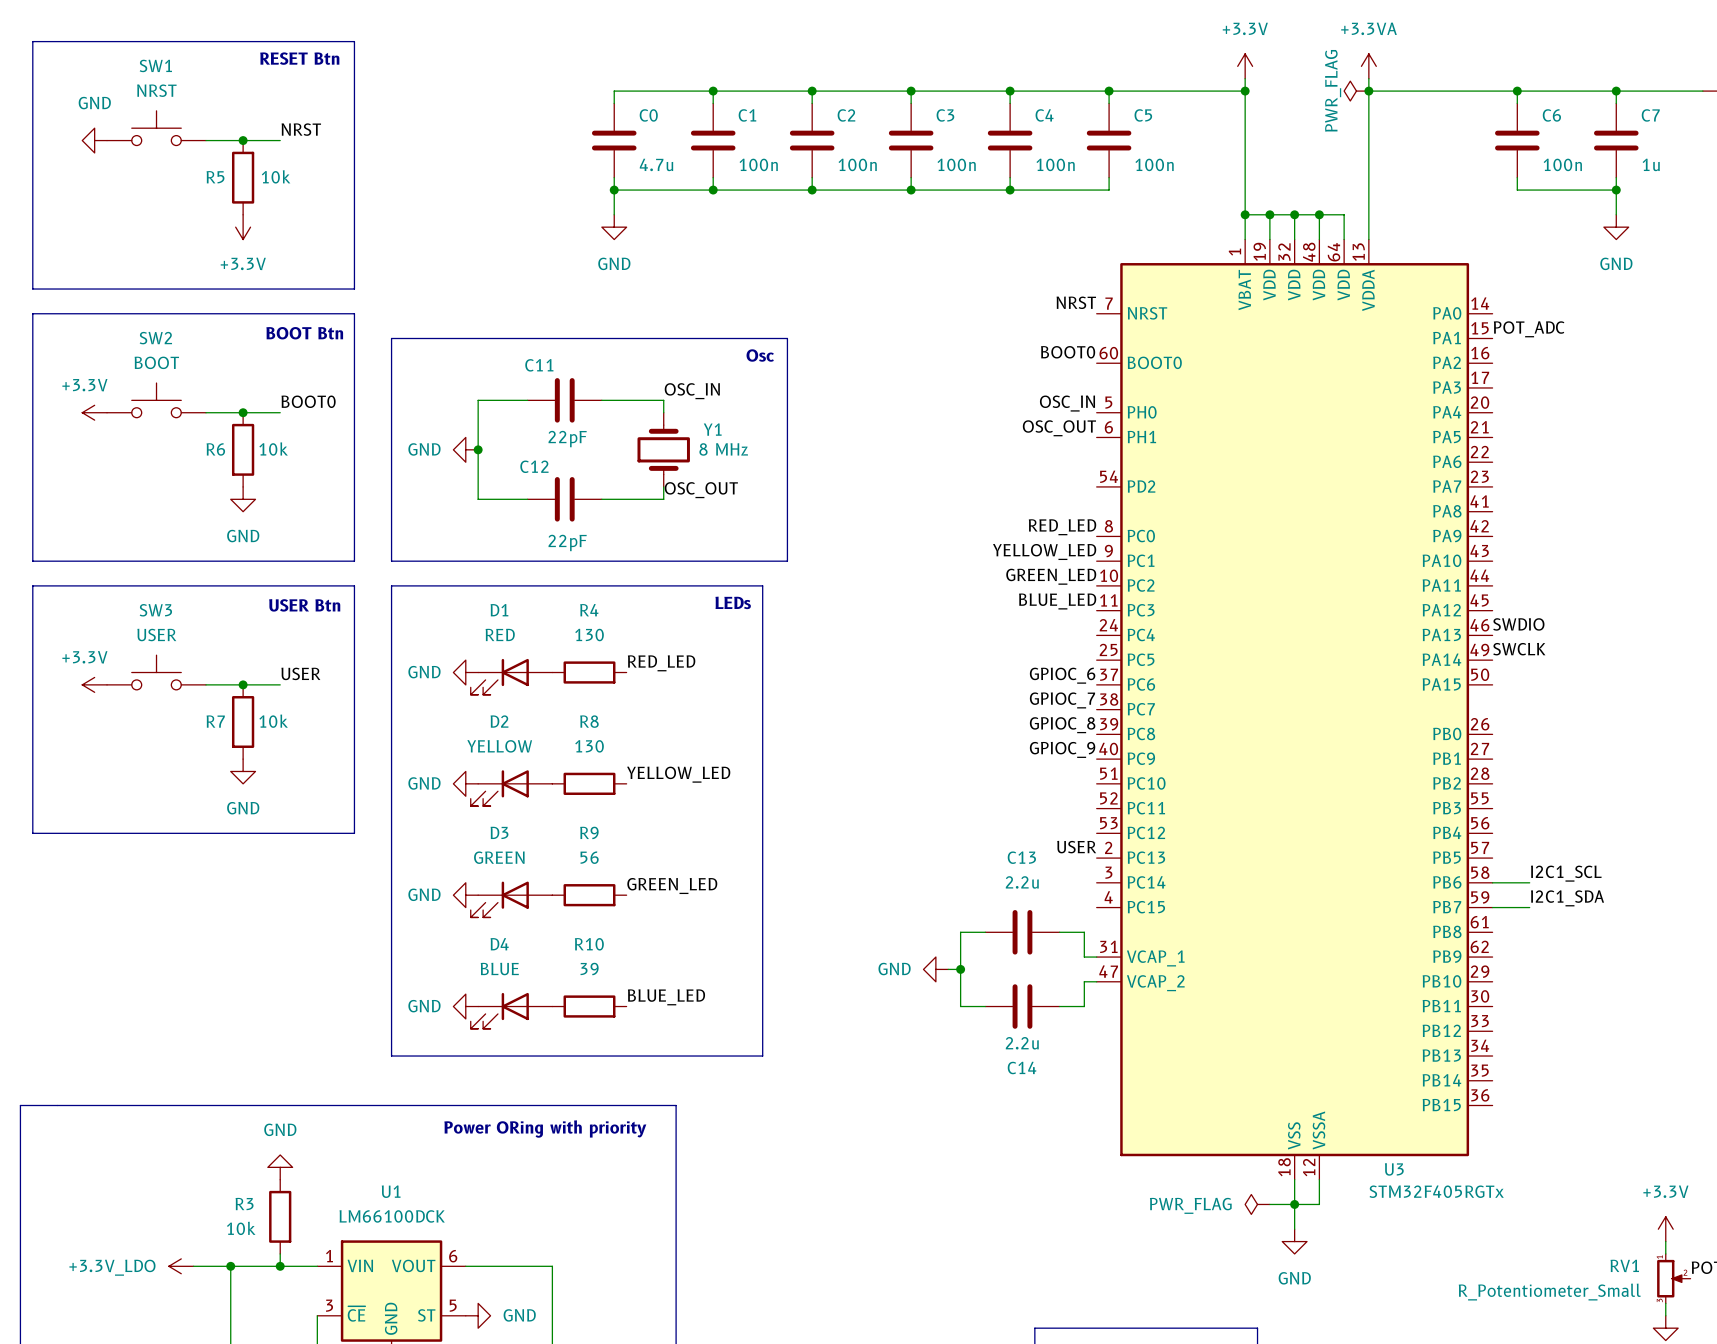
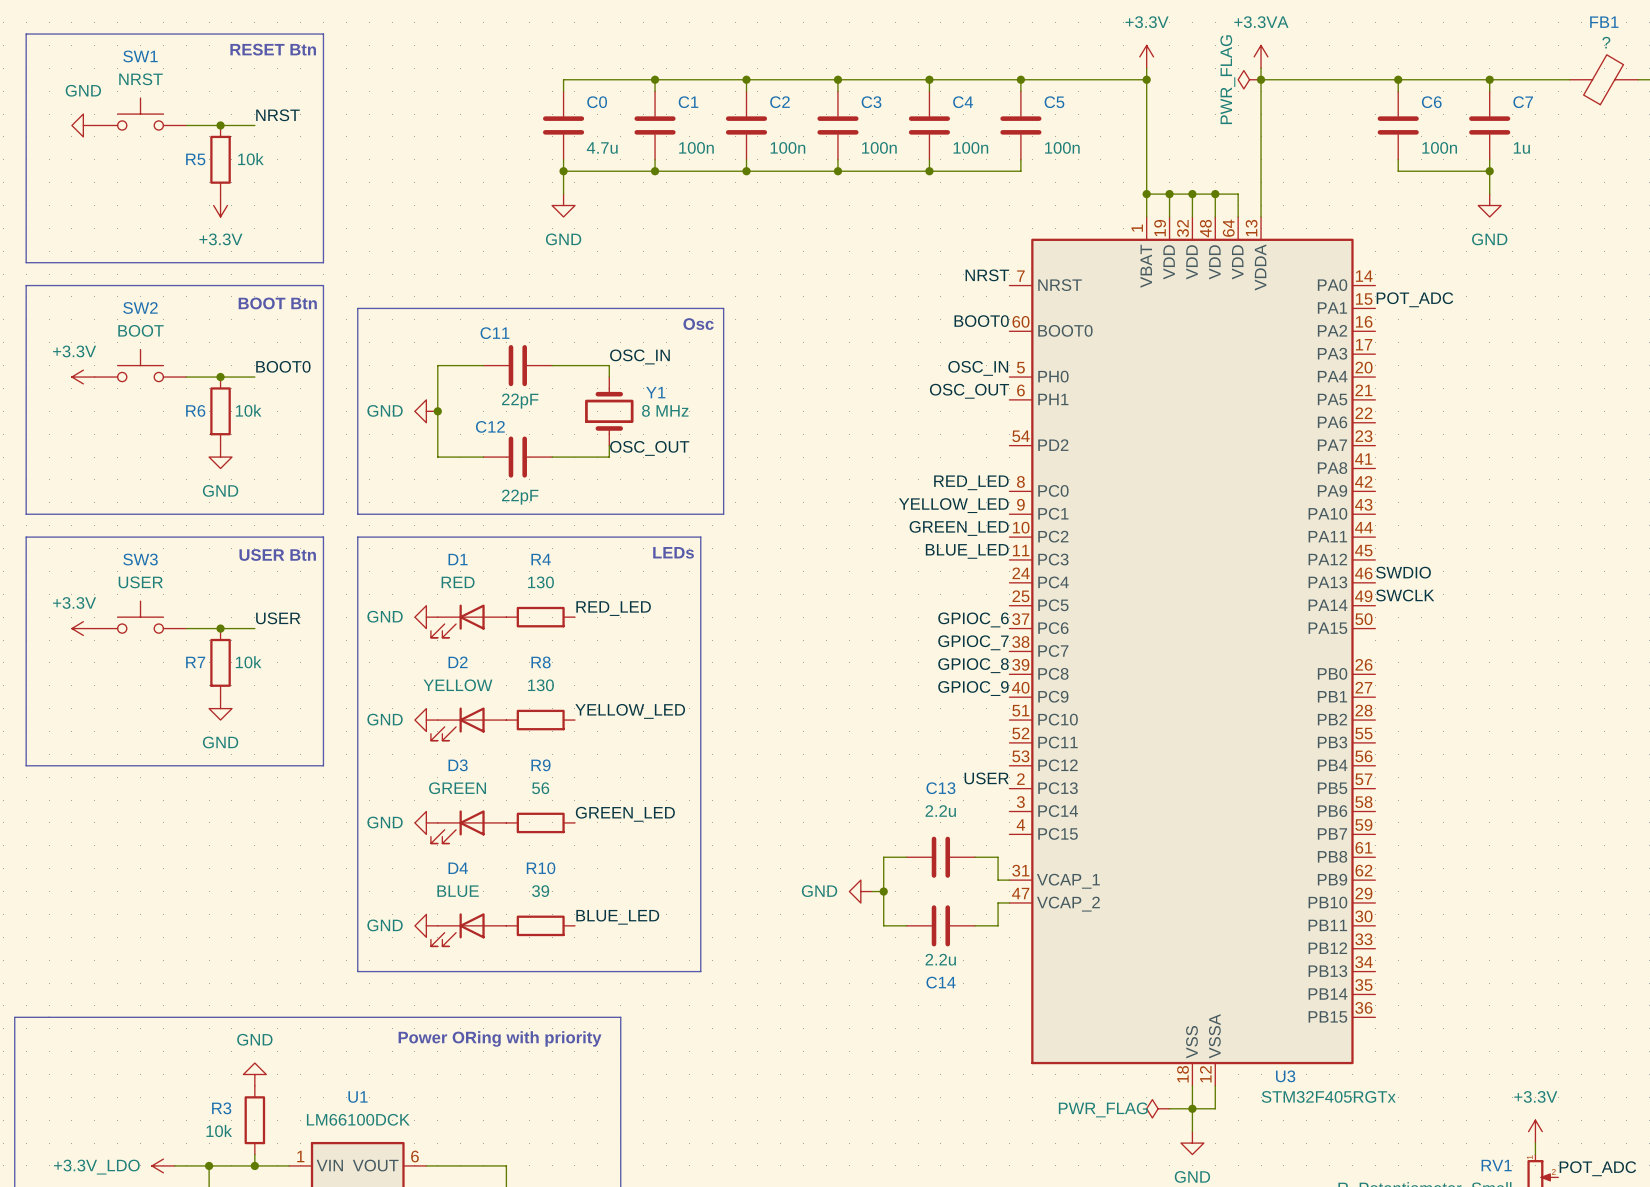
label: I2C1_SCL (1566, 873) -> none
wire: (1492, 882) (1529, 882) -> none
label: I2C1_SDA (1567, 898) -> none
wire: (1492, 907) (1529, 907) -> none

